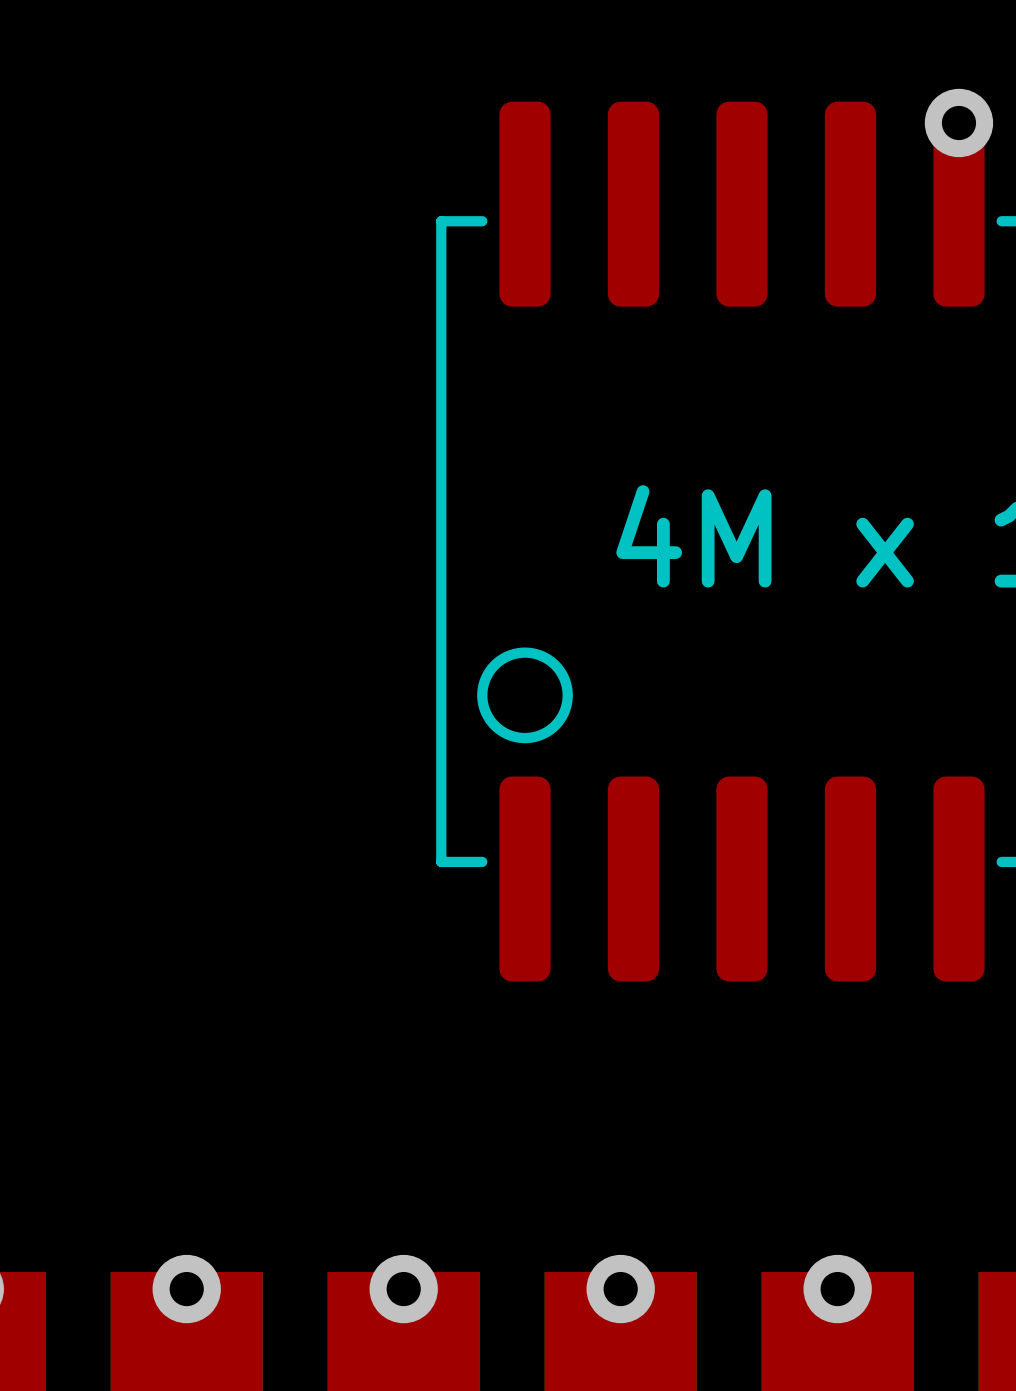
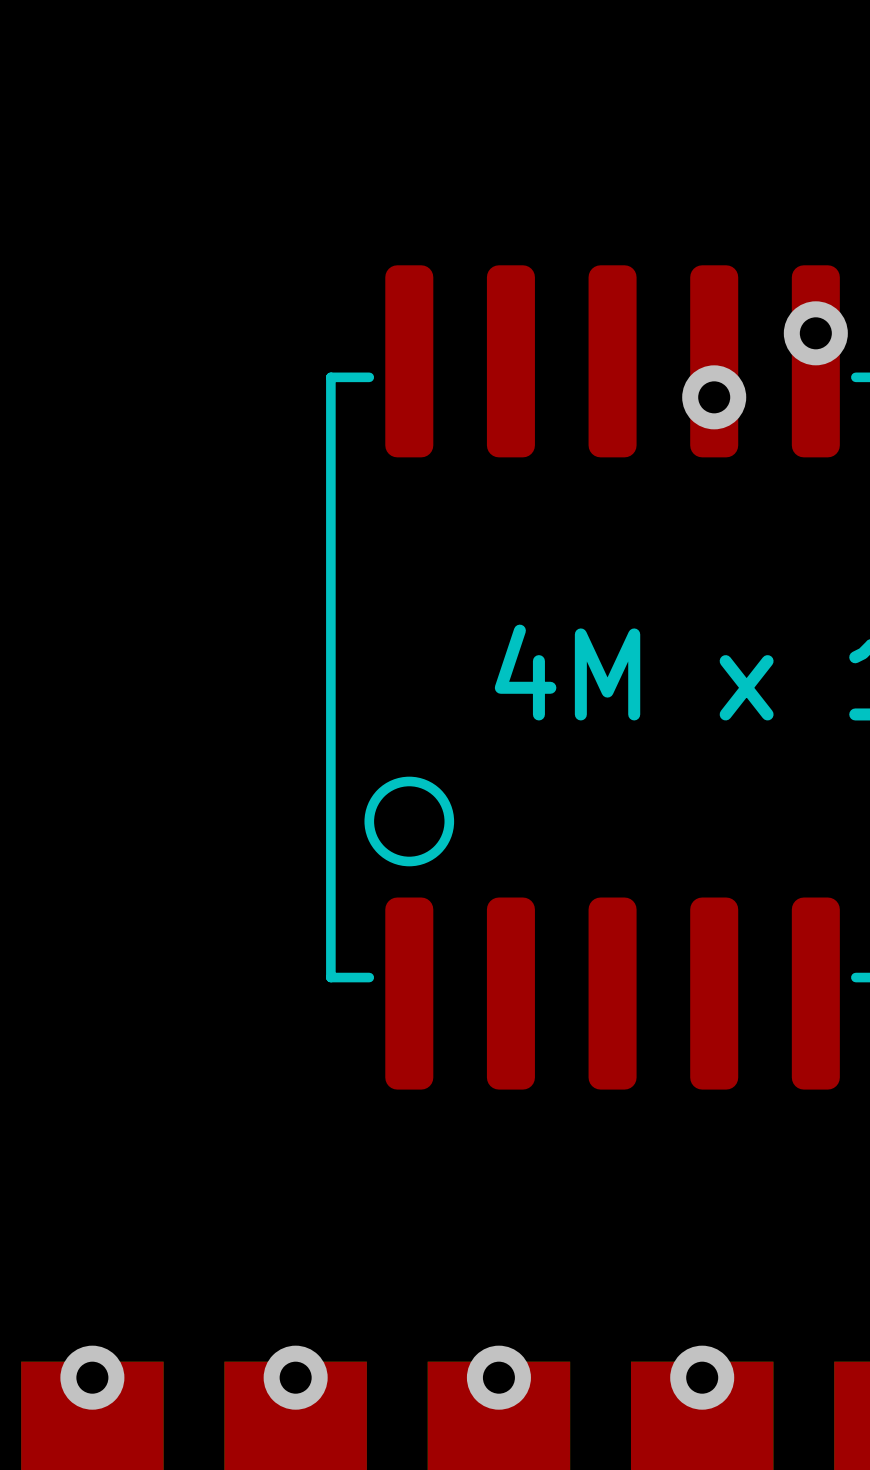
via position: (958, 123) -> (815, 333)
via: none -> (714, 397)

